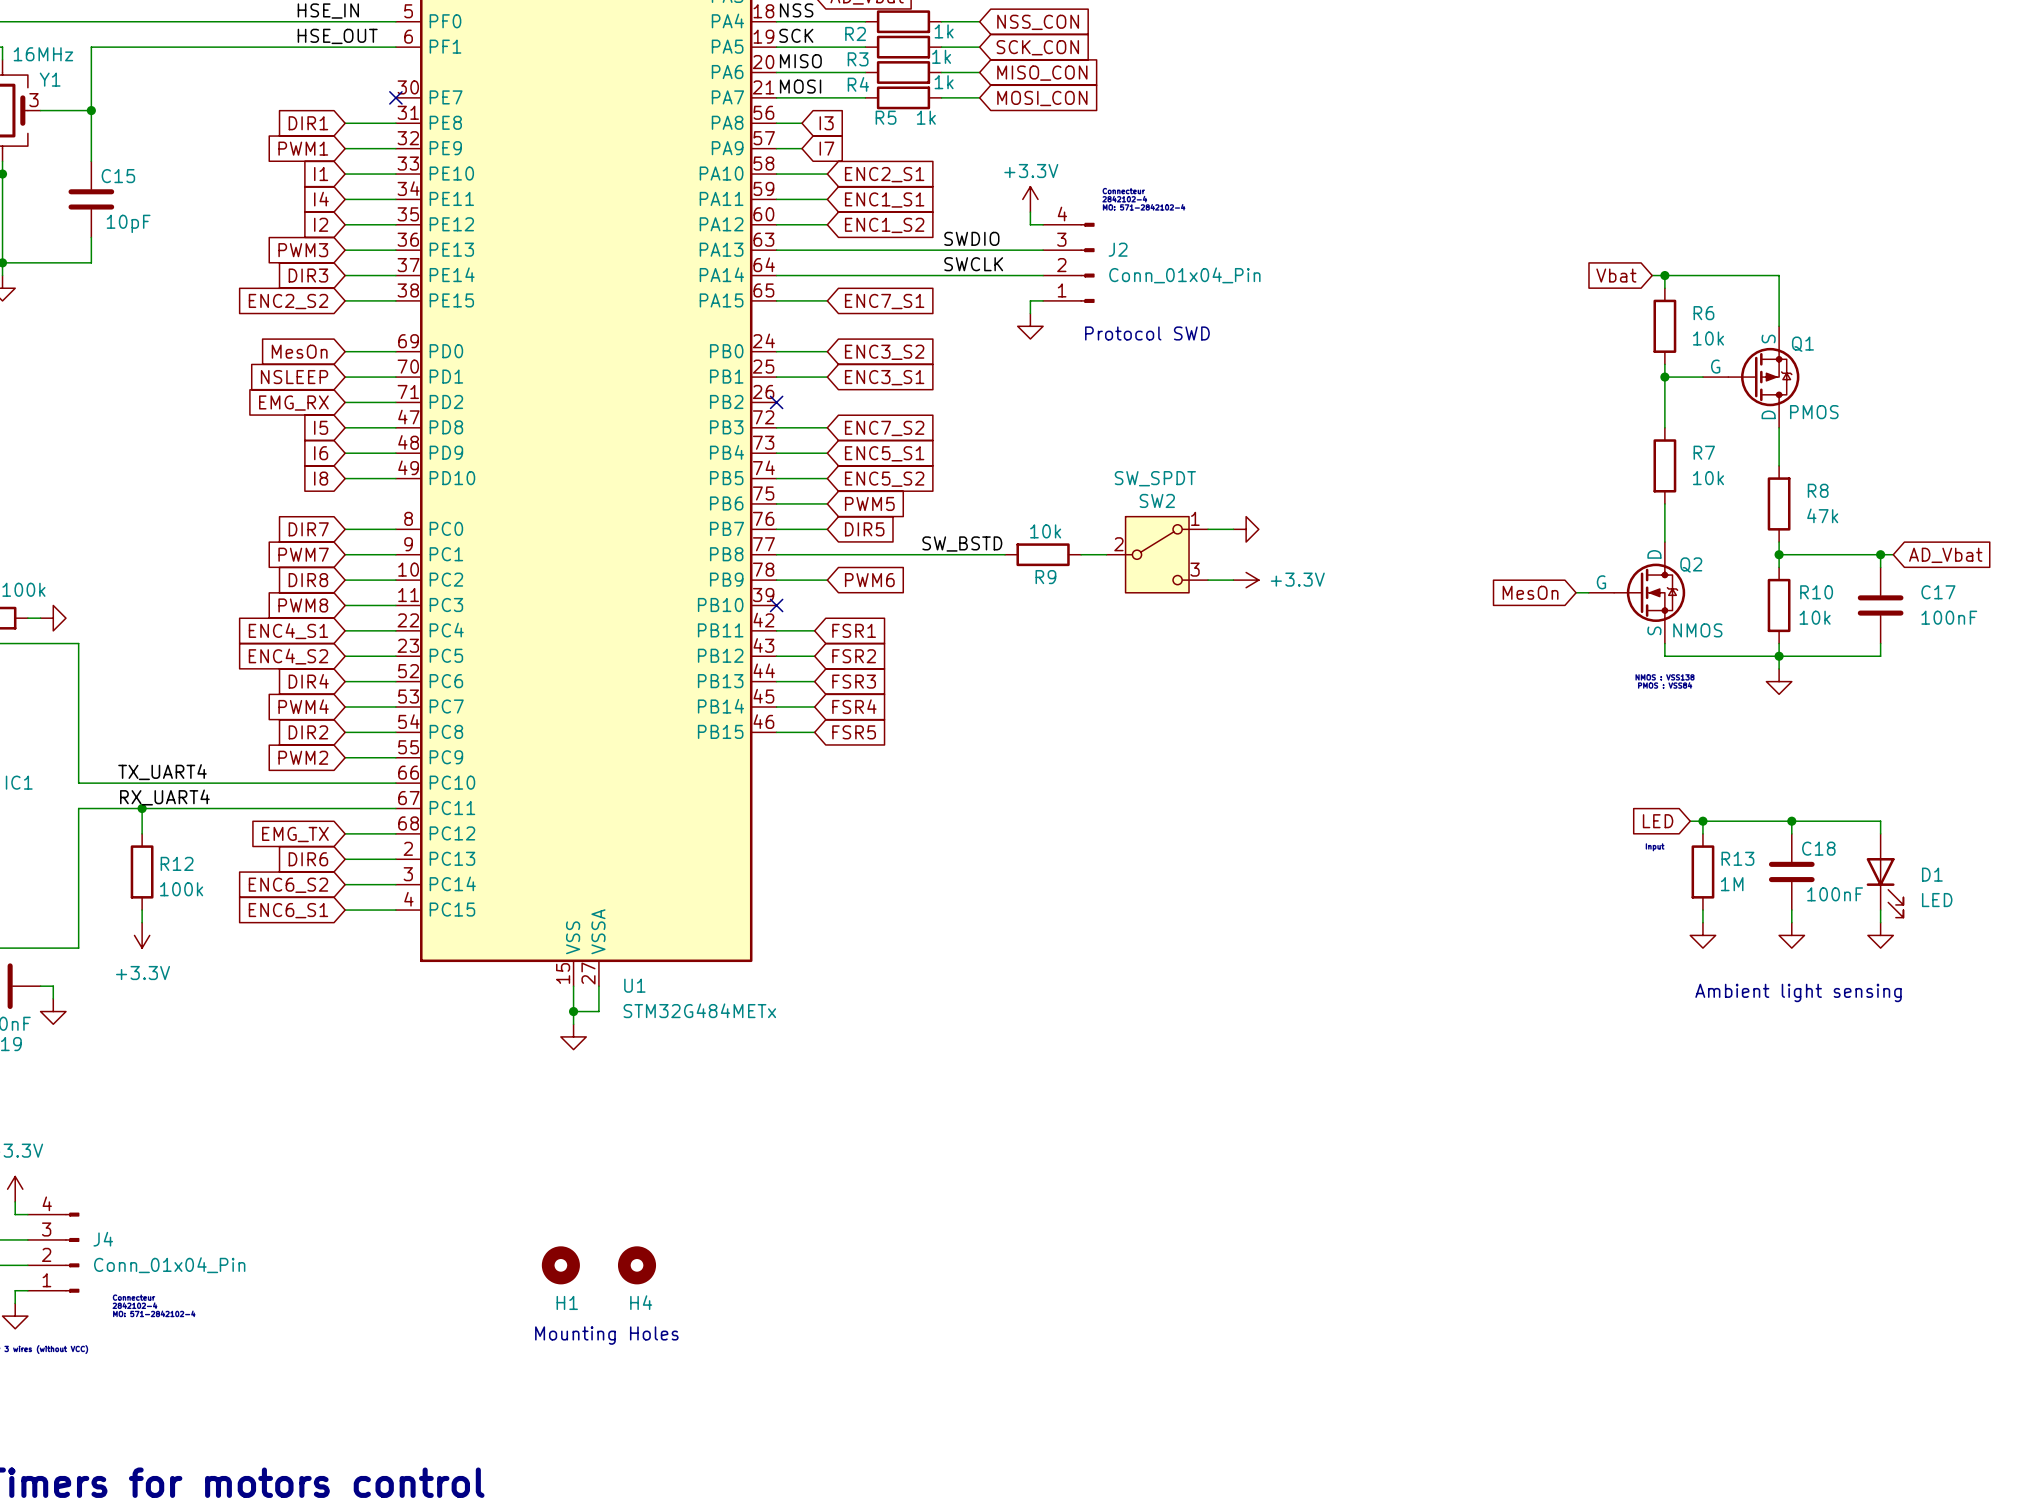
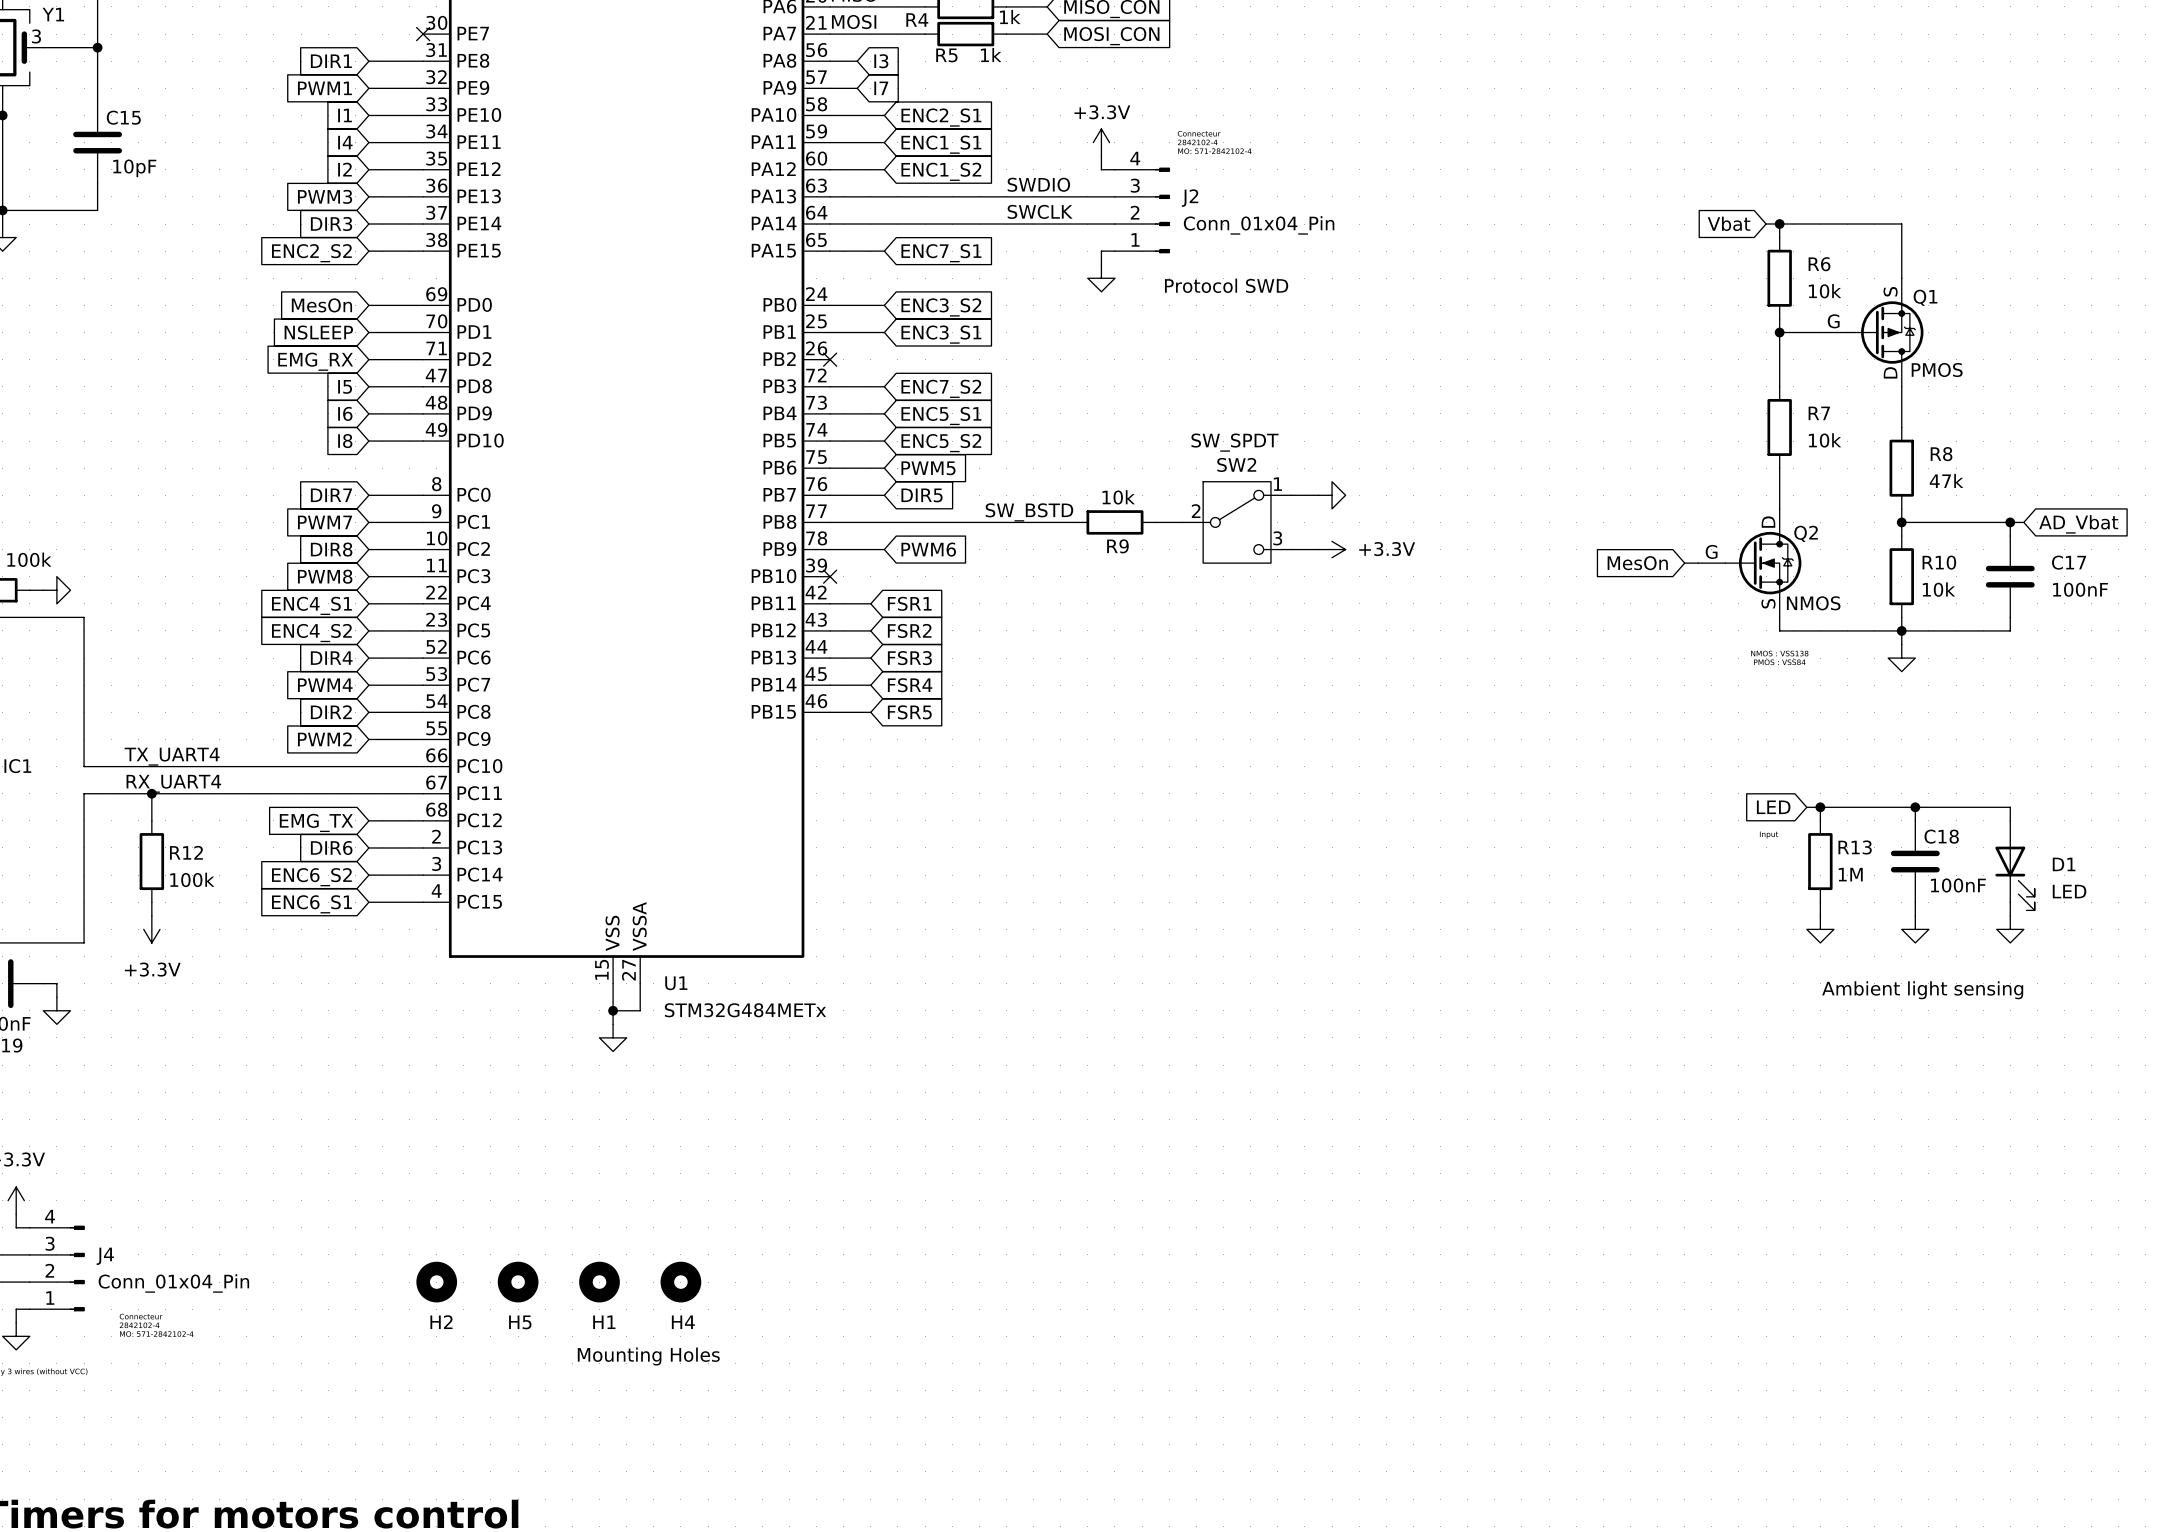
H2: none -> (436, 1282)
H5: none -> (518, 1282)

